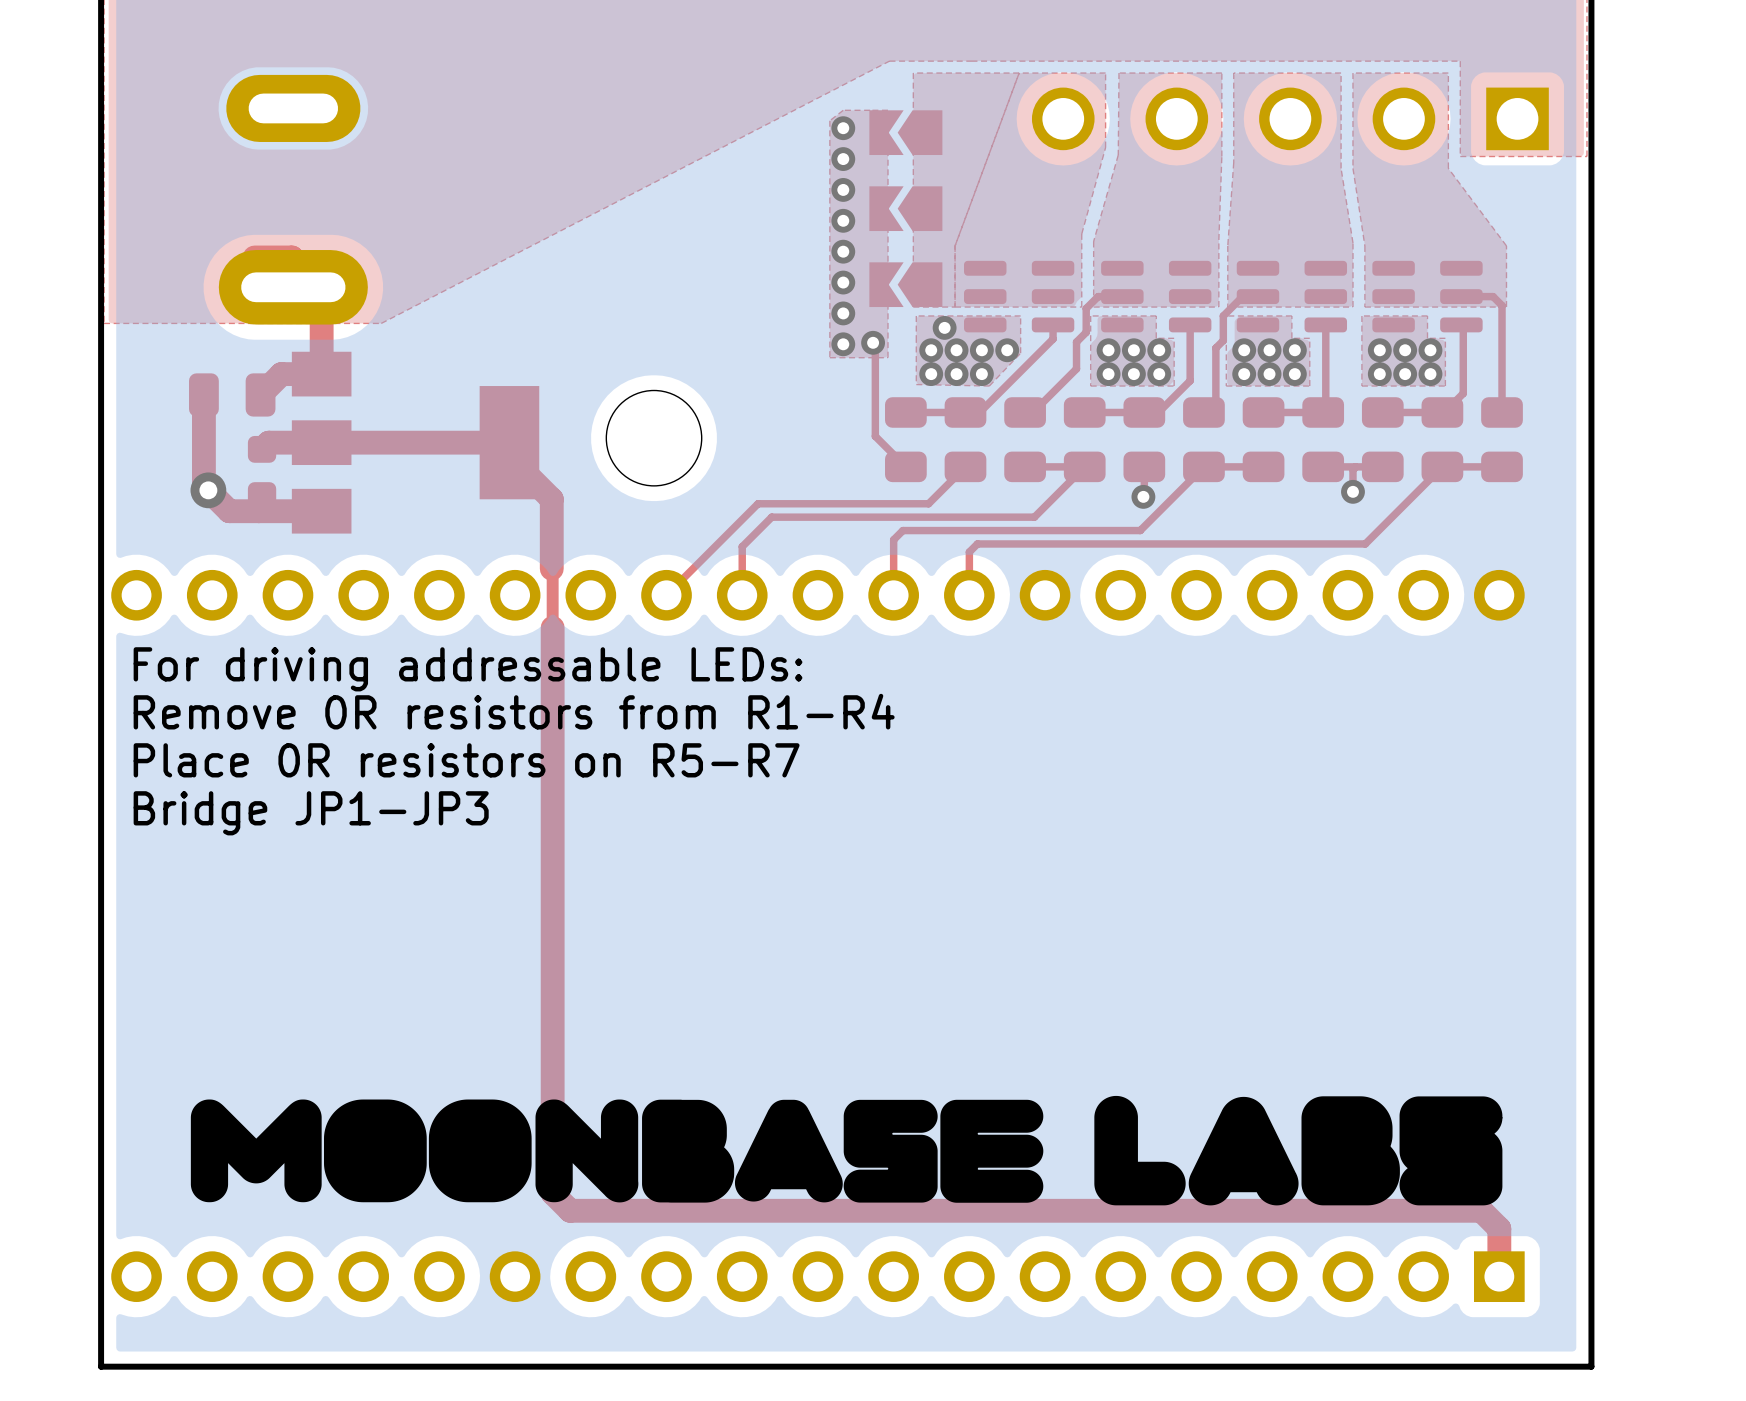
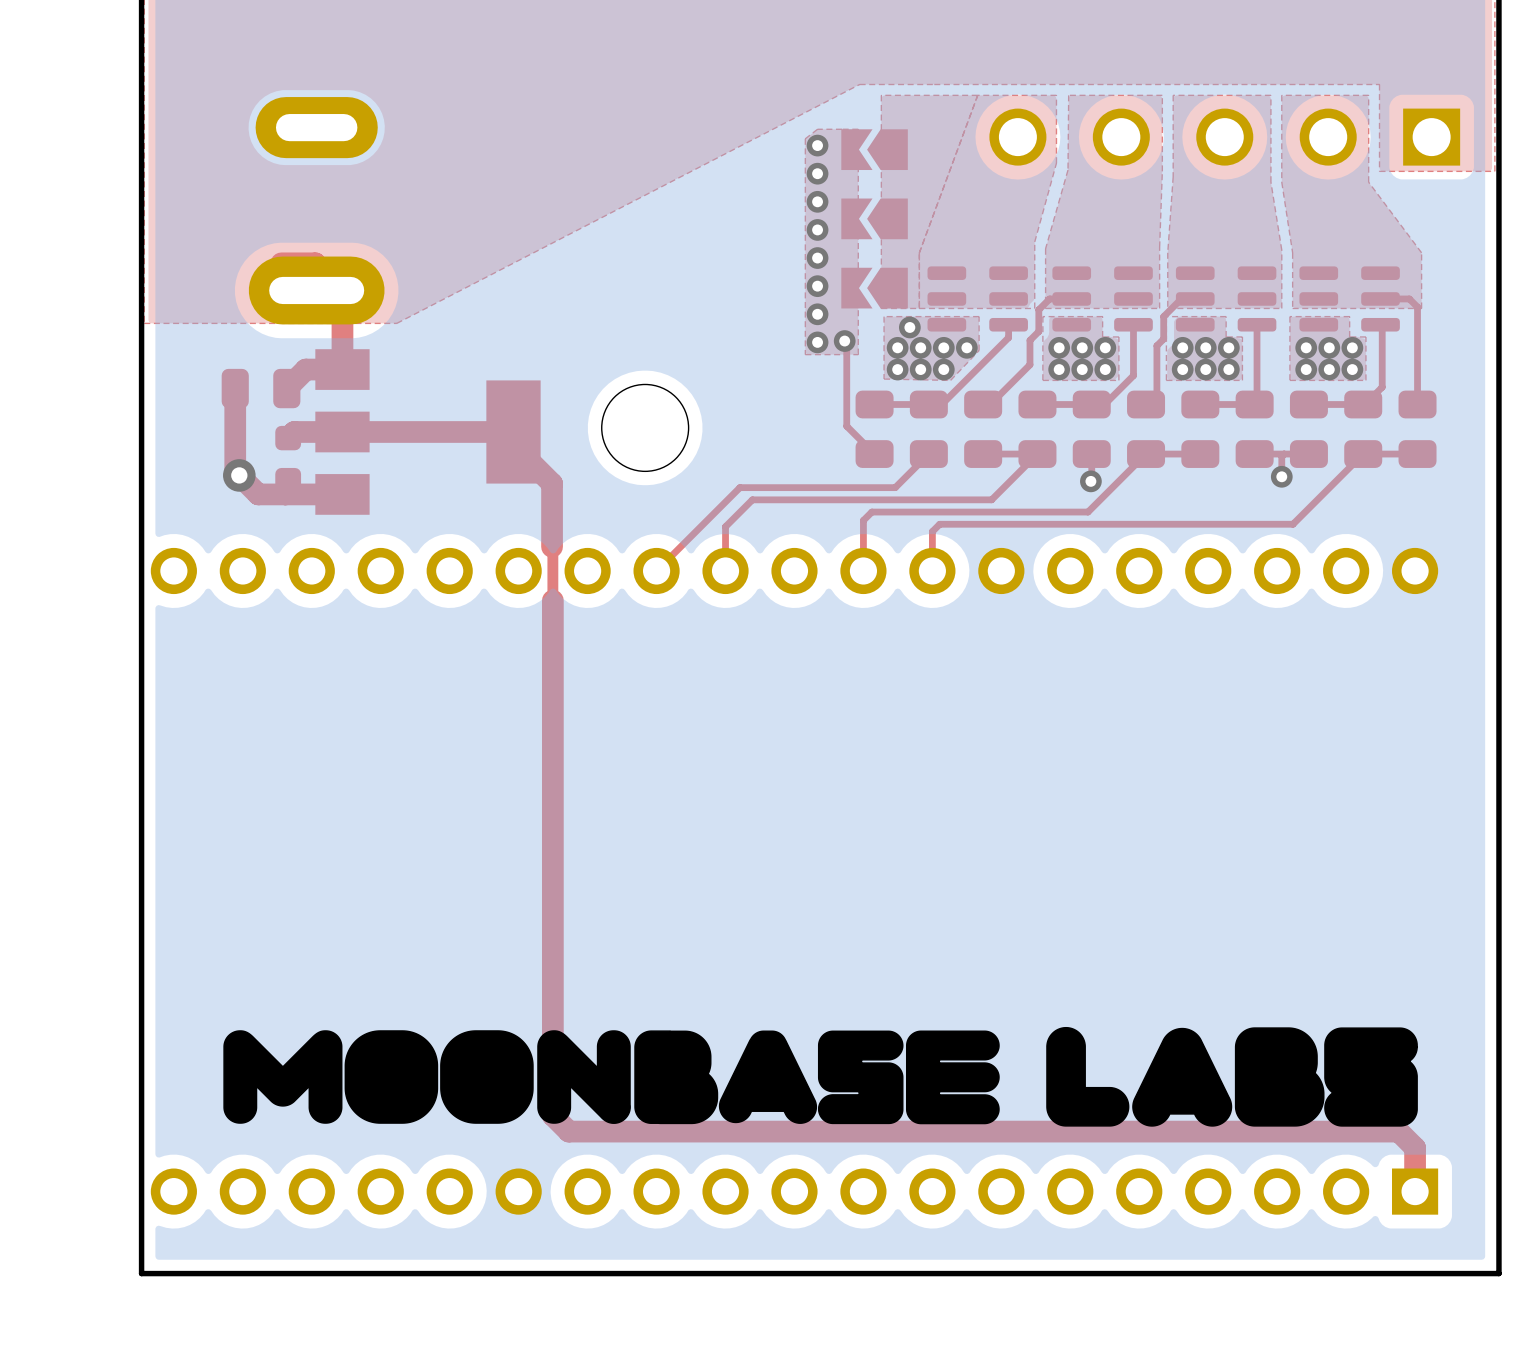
text: For driving addressable LEDs: (468, 669) -> none
text: Remove 0R resistors from R1-R4 (514, 711) -> none
text: Place 0R resistors on R5-R7 (466, 760) -> none
text: Bridge JP1-JP3 (311, 813) -> none

